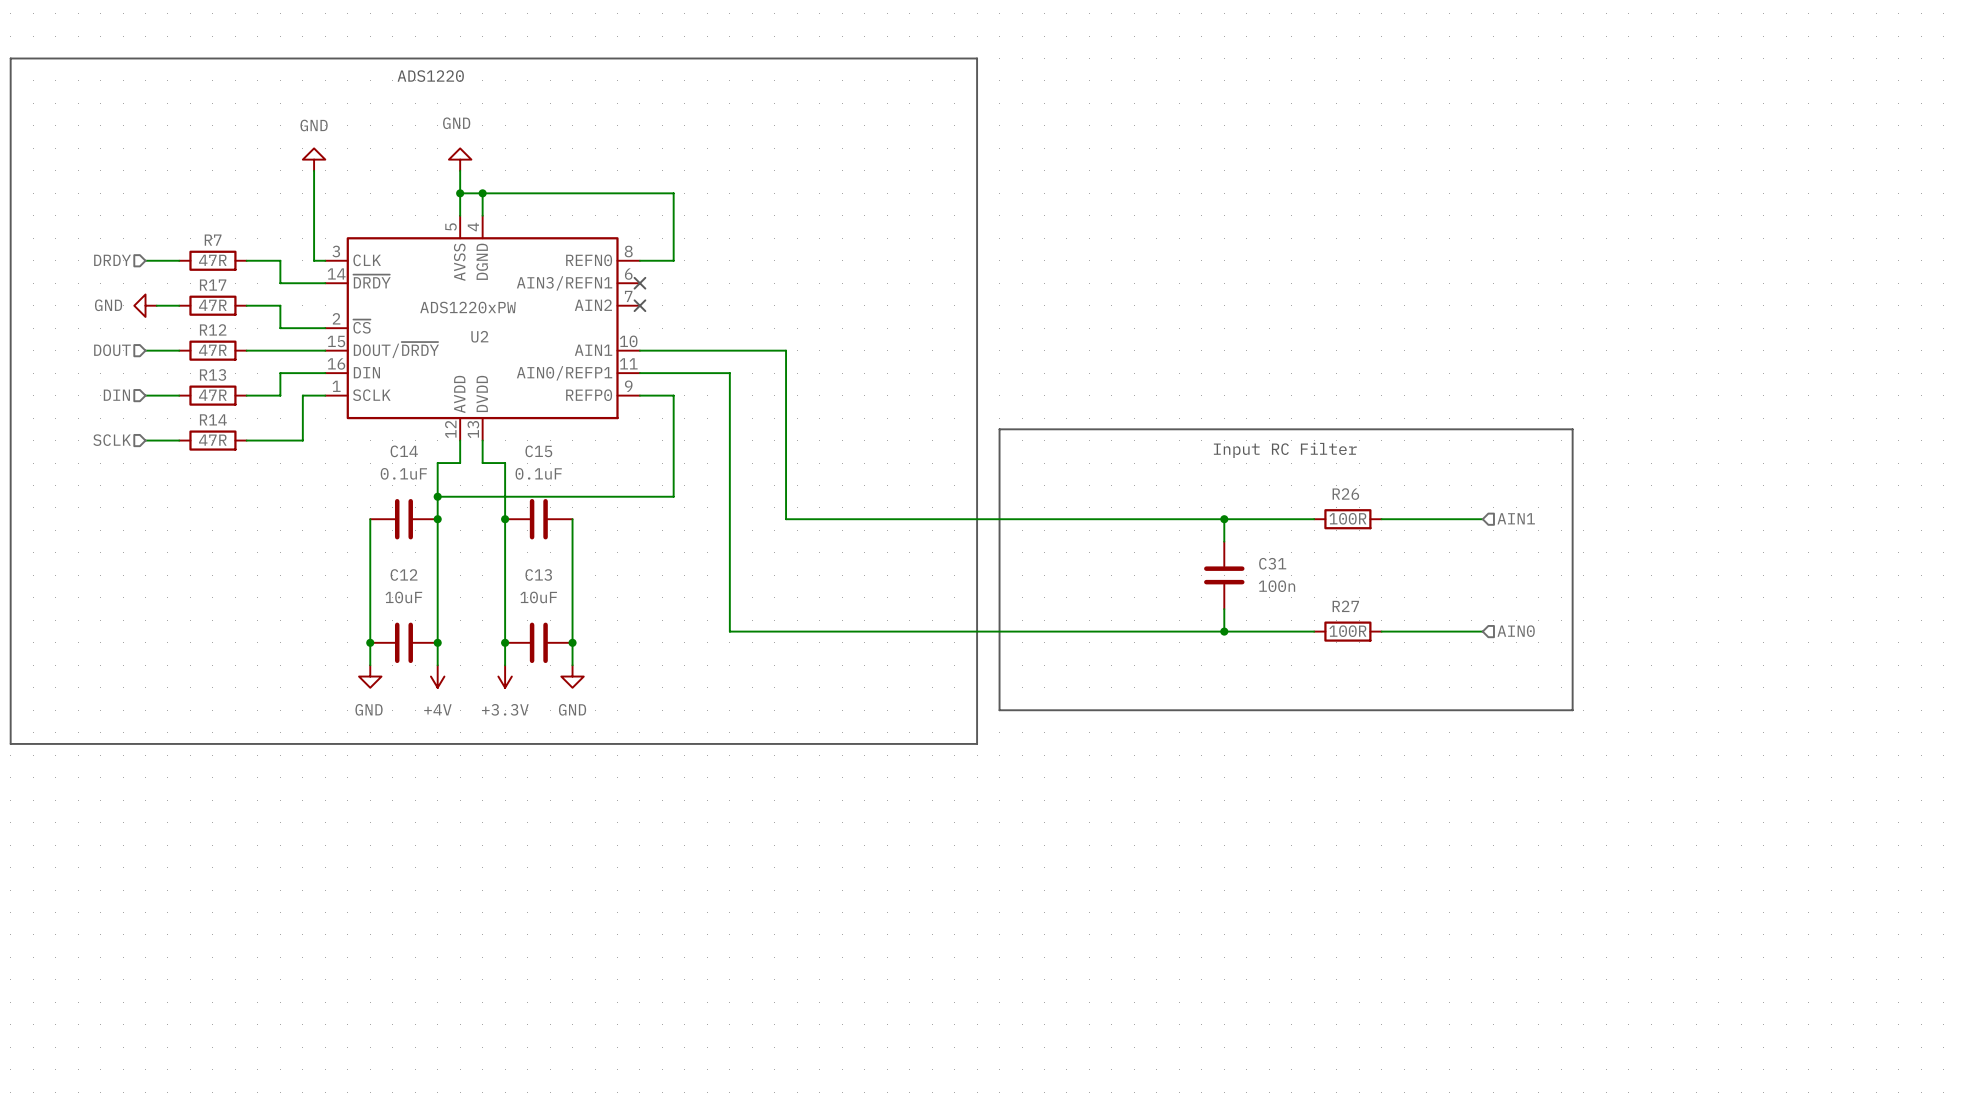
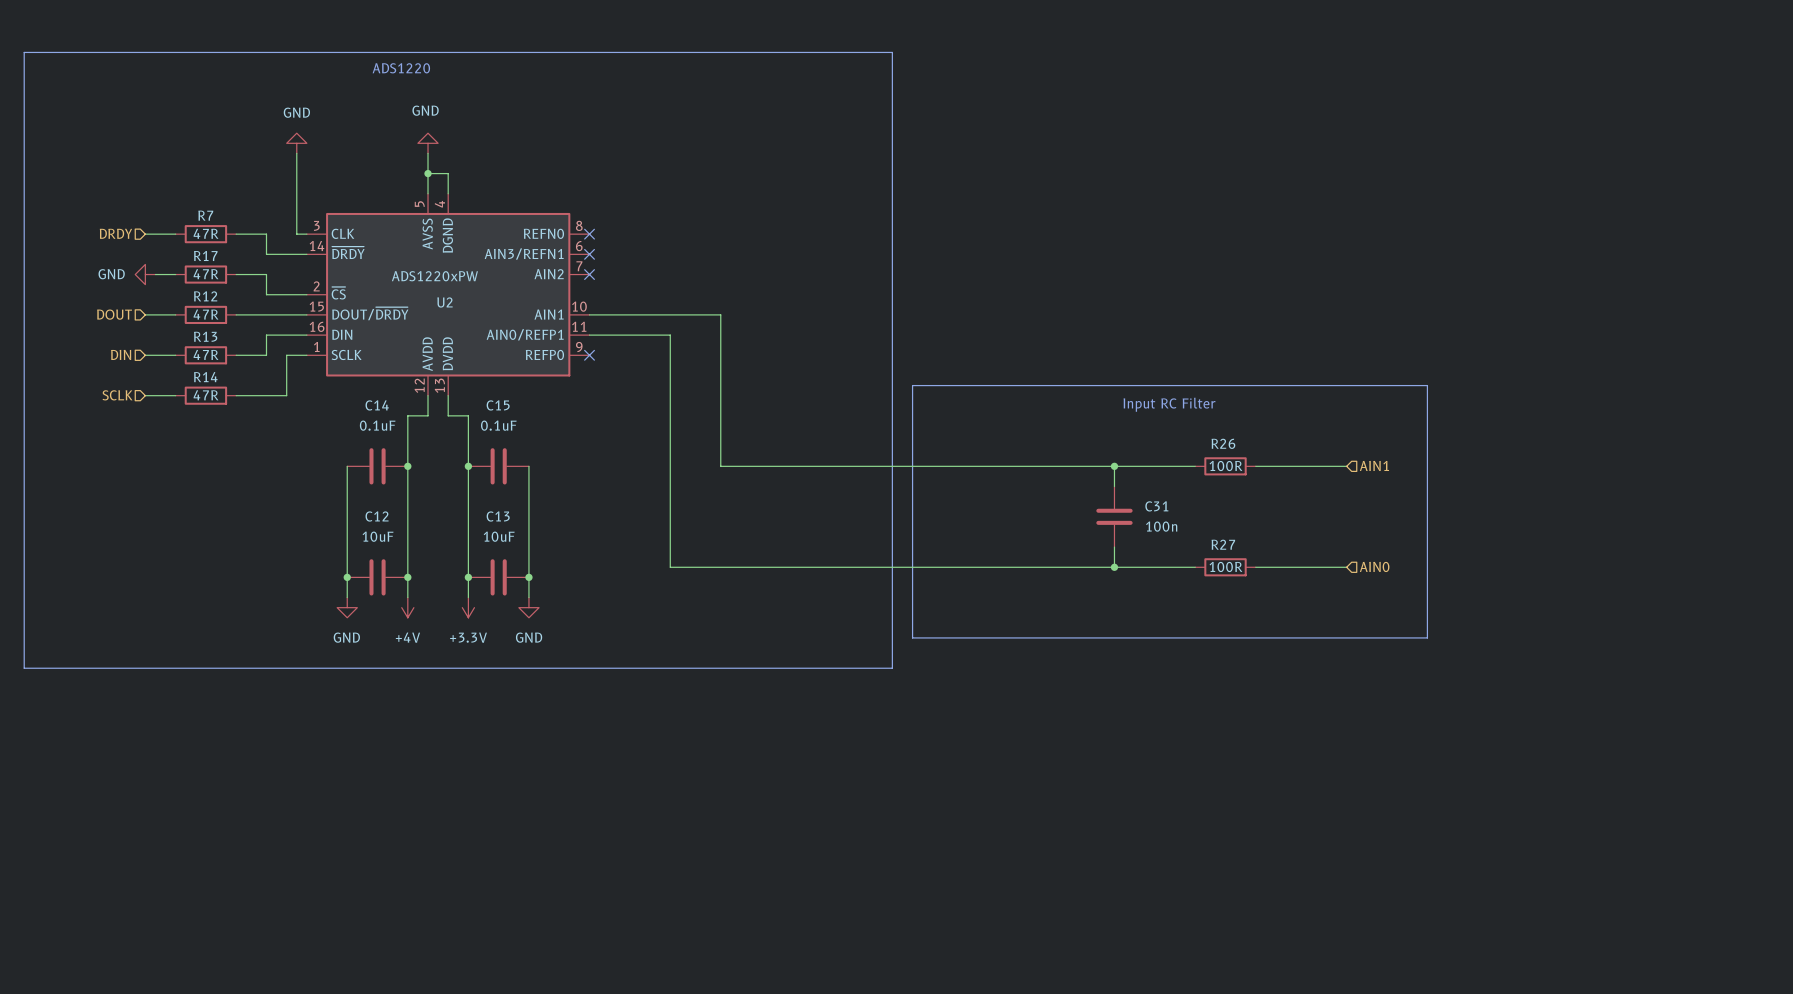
wire: (482, 193) (673, 193) (673, 260) (639, 260) -> none
junction: (482, 193) -> none
no-connect mark: none -> (589, 234)
wire: (639, 395) (673, 395) (673, 496) (437, 496) -> none
no-connect mark: none -> (589, 355)
junction: (437, 496) -> none

